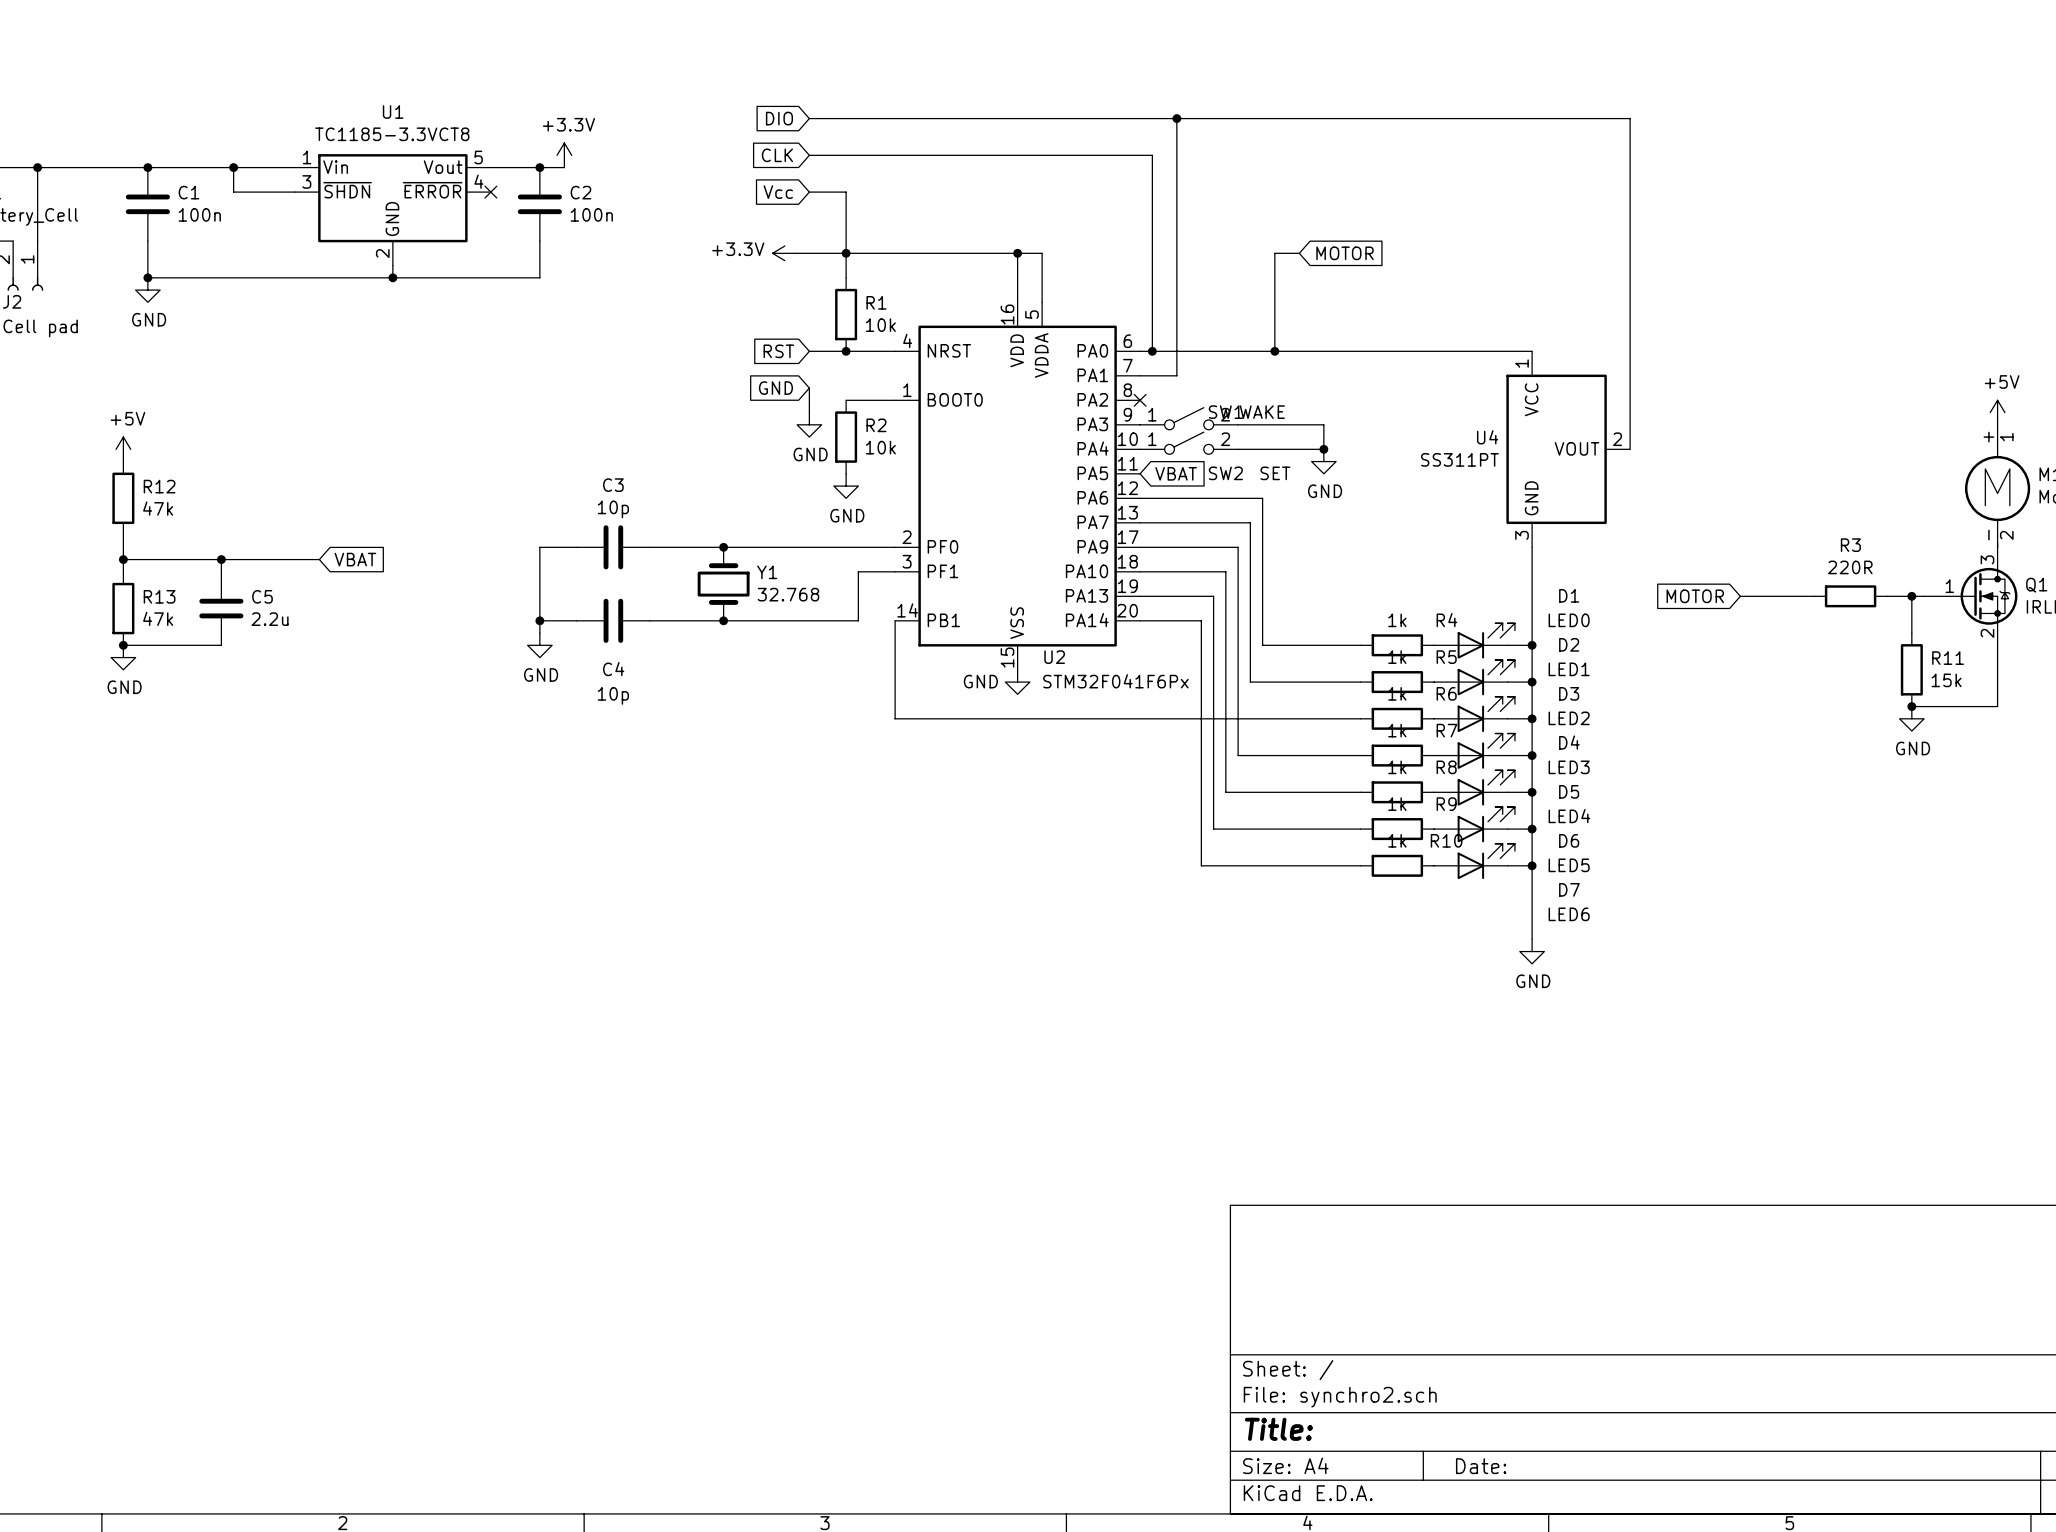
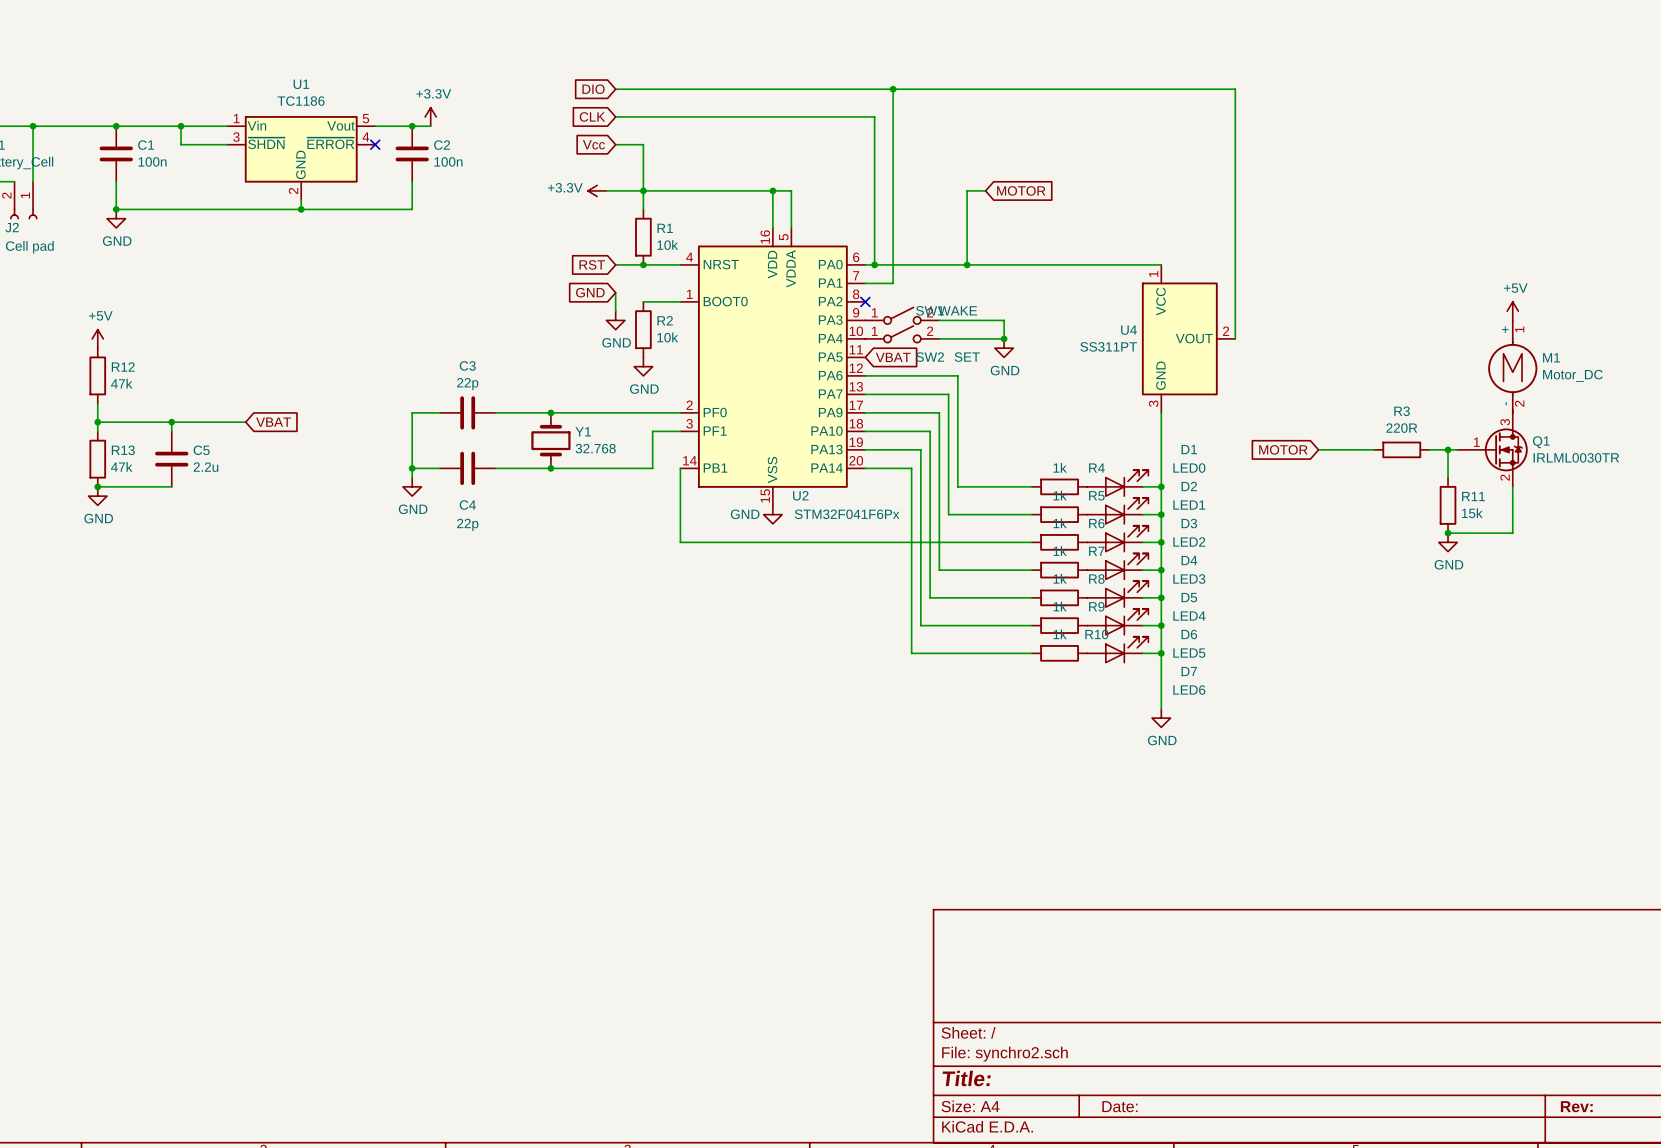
U1 value: TC1185-3.3VCT8 (392, 134) -> TC1186 (301, 101)
C3 value: 10p (613, 509) -> 22p (467, 384)
C4 value: 10p (613, 695) -> 22p (467, 524)

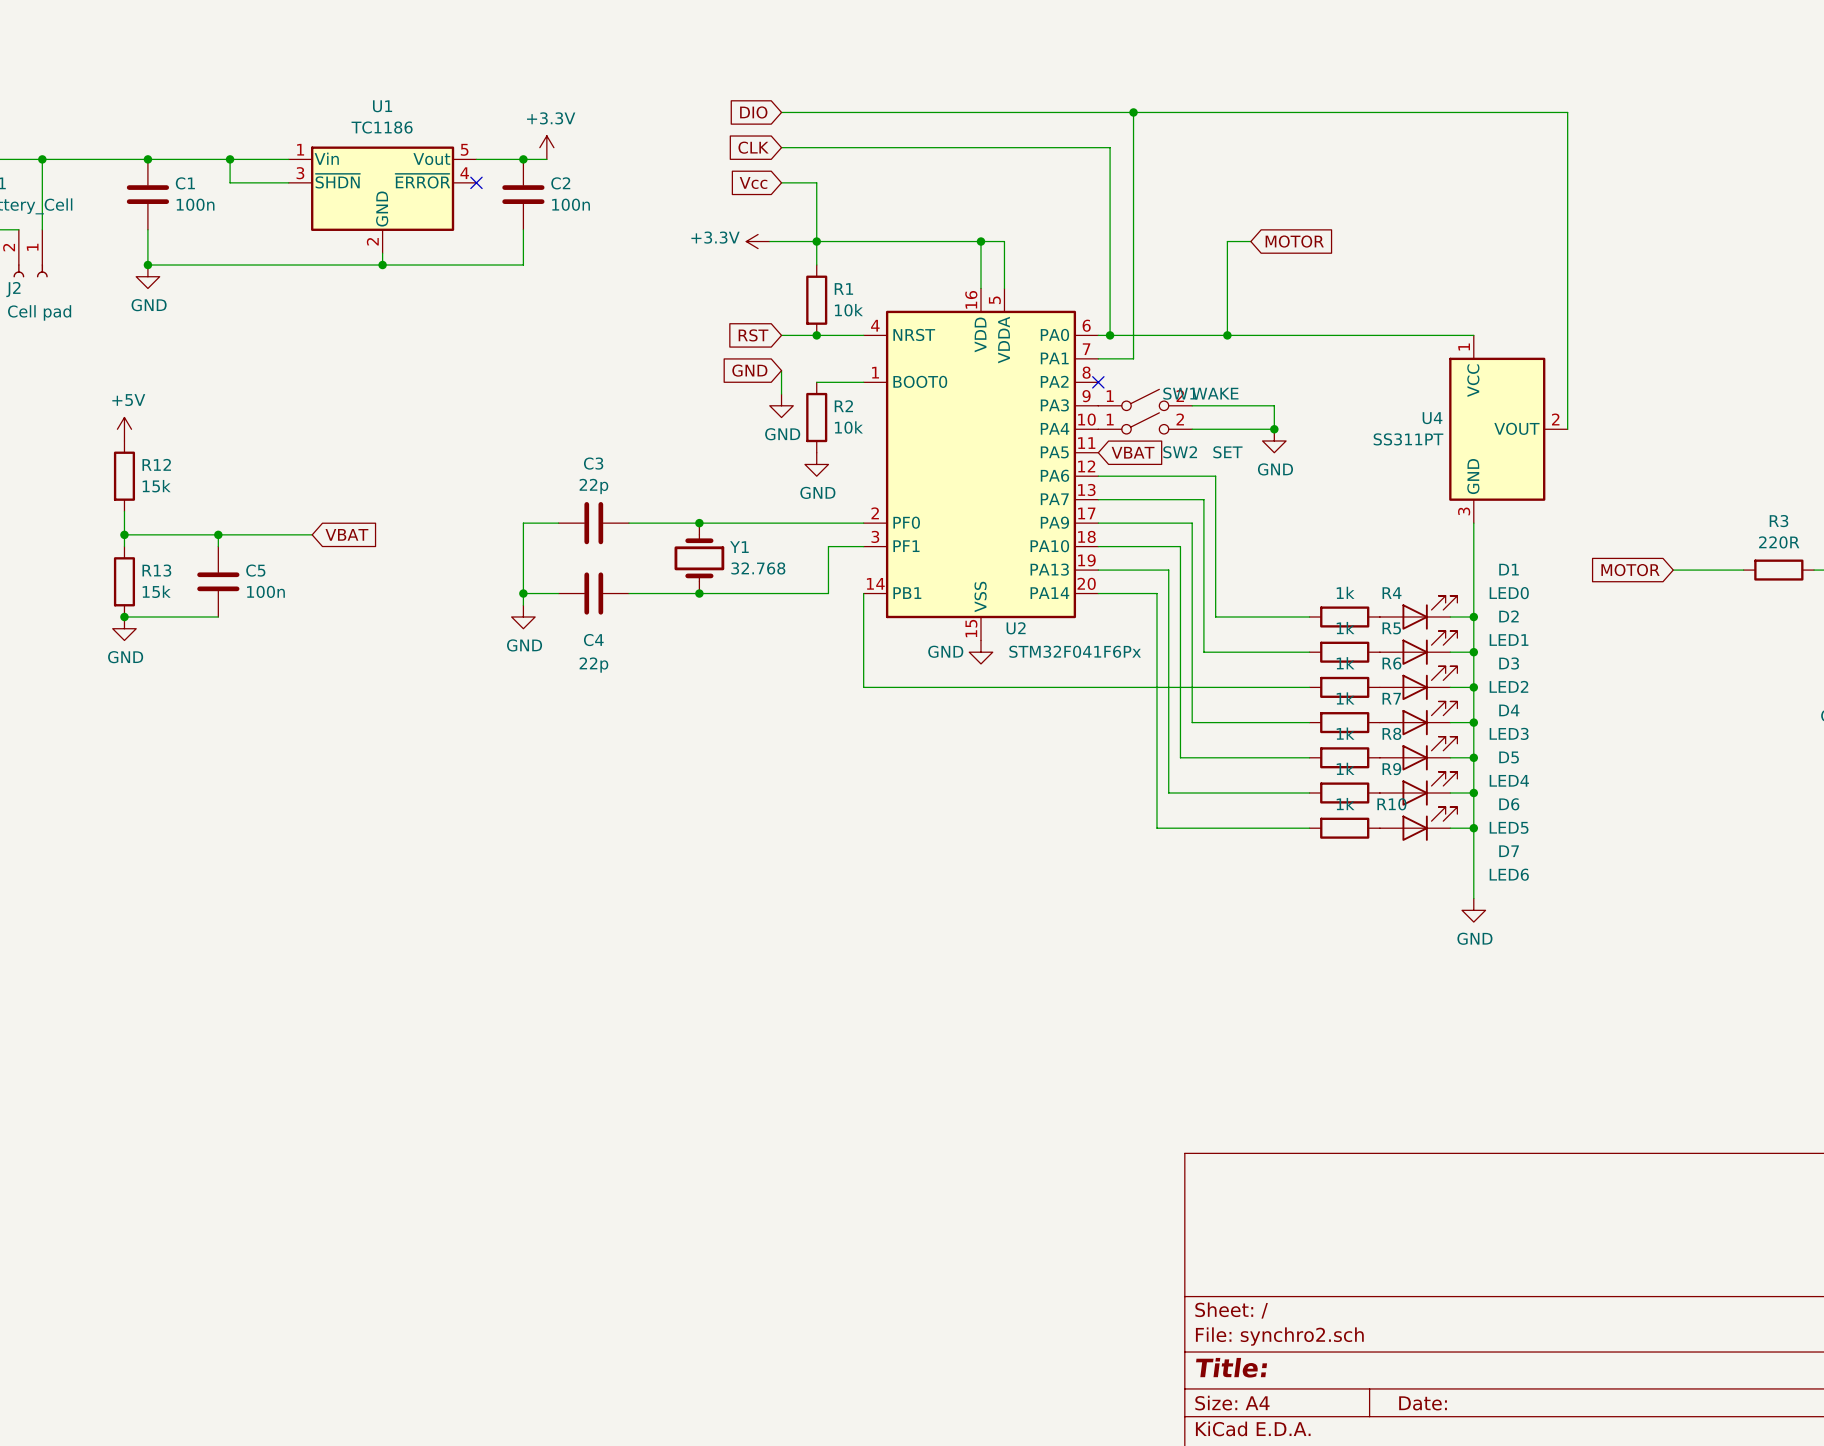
R12 value: 47k (121, 383) -> 15k (156, 486)
R13 value: 47k (121, 466) -> 15k (156, 591)
C5 value: 2.2u (205, 467) -> 100n (265, 591)

